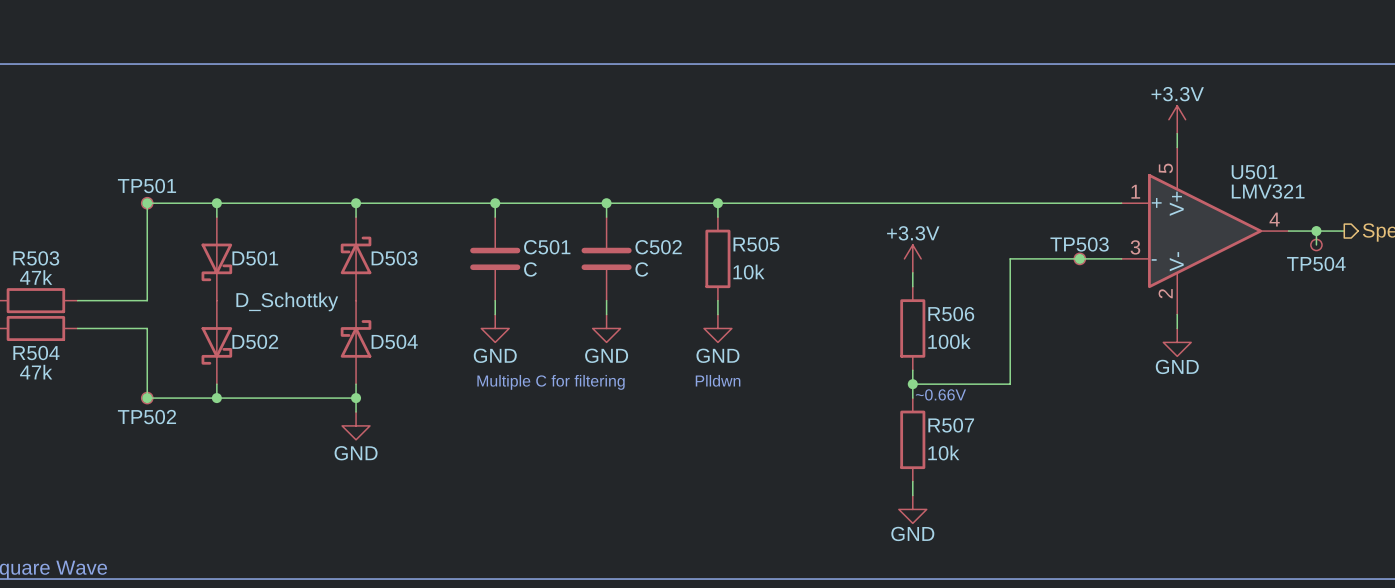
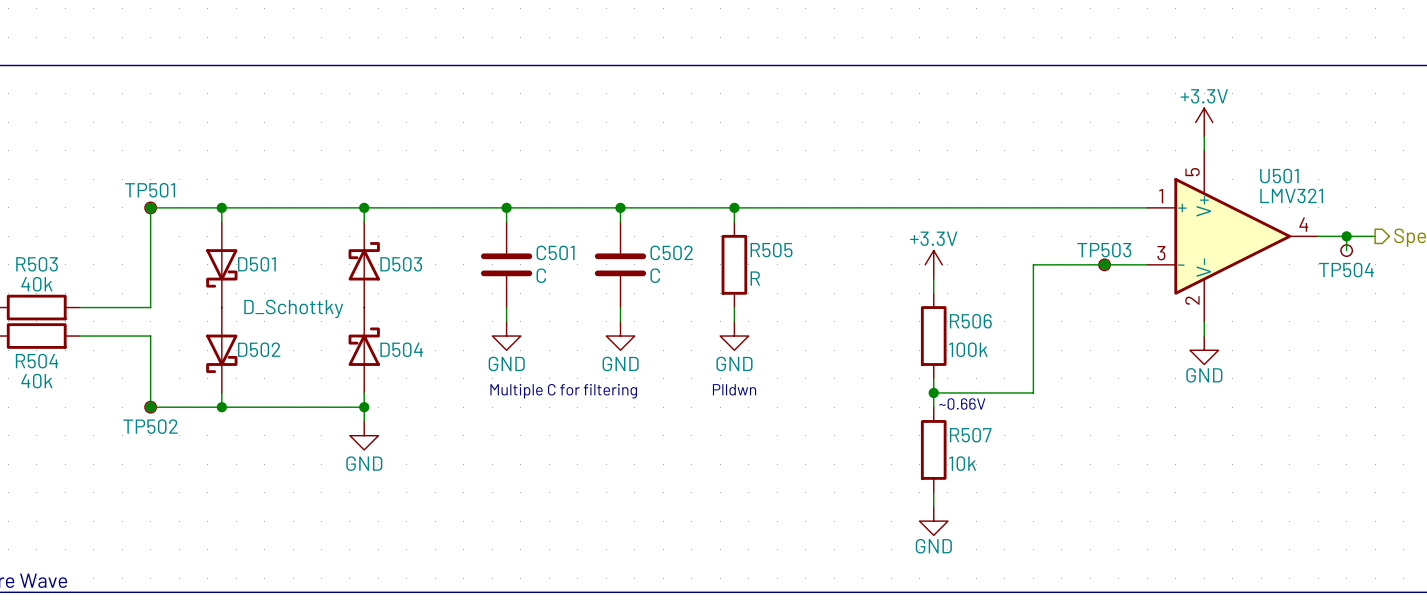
R505 value: 10k (748, 272) -> R (755, 278)
R503 value: 47k (36, 277) -> 40k (36, 284)
R504 value: 47k (36, 372) -> 40k (36, 381)

